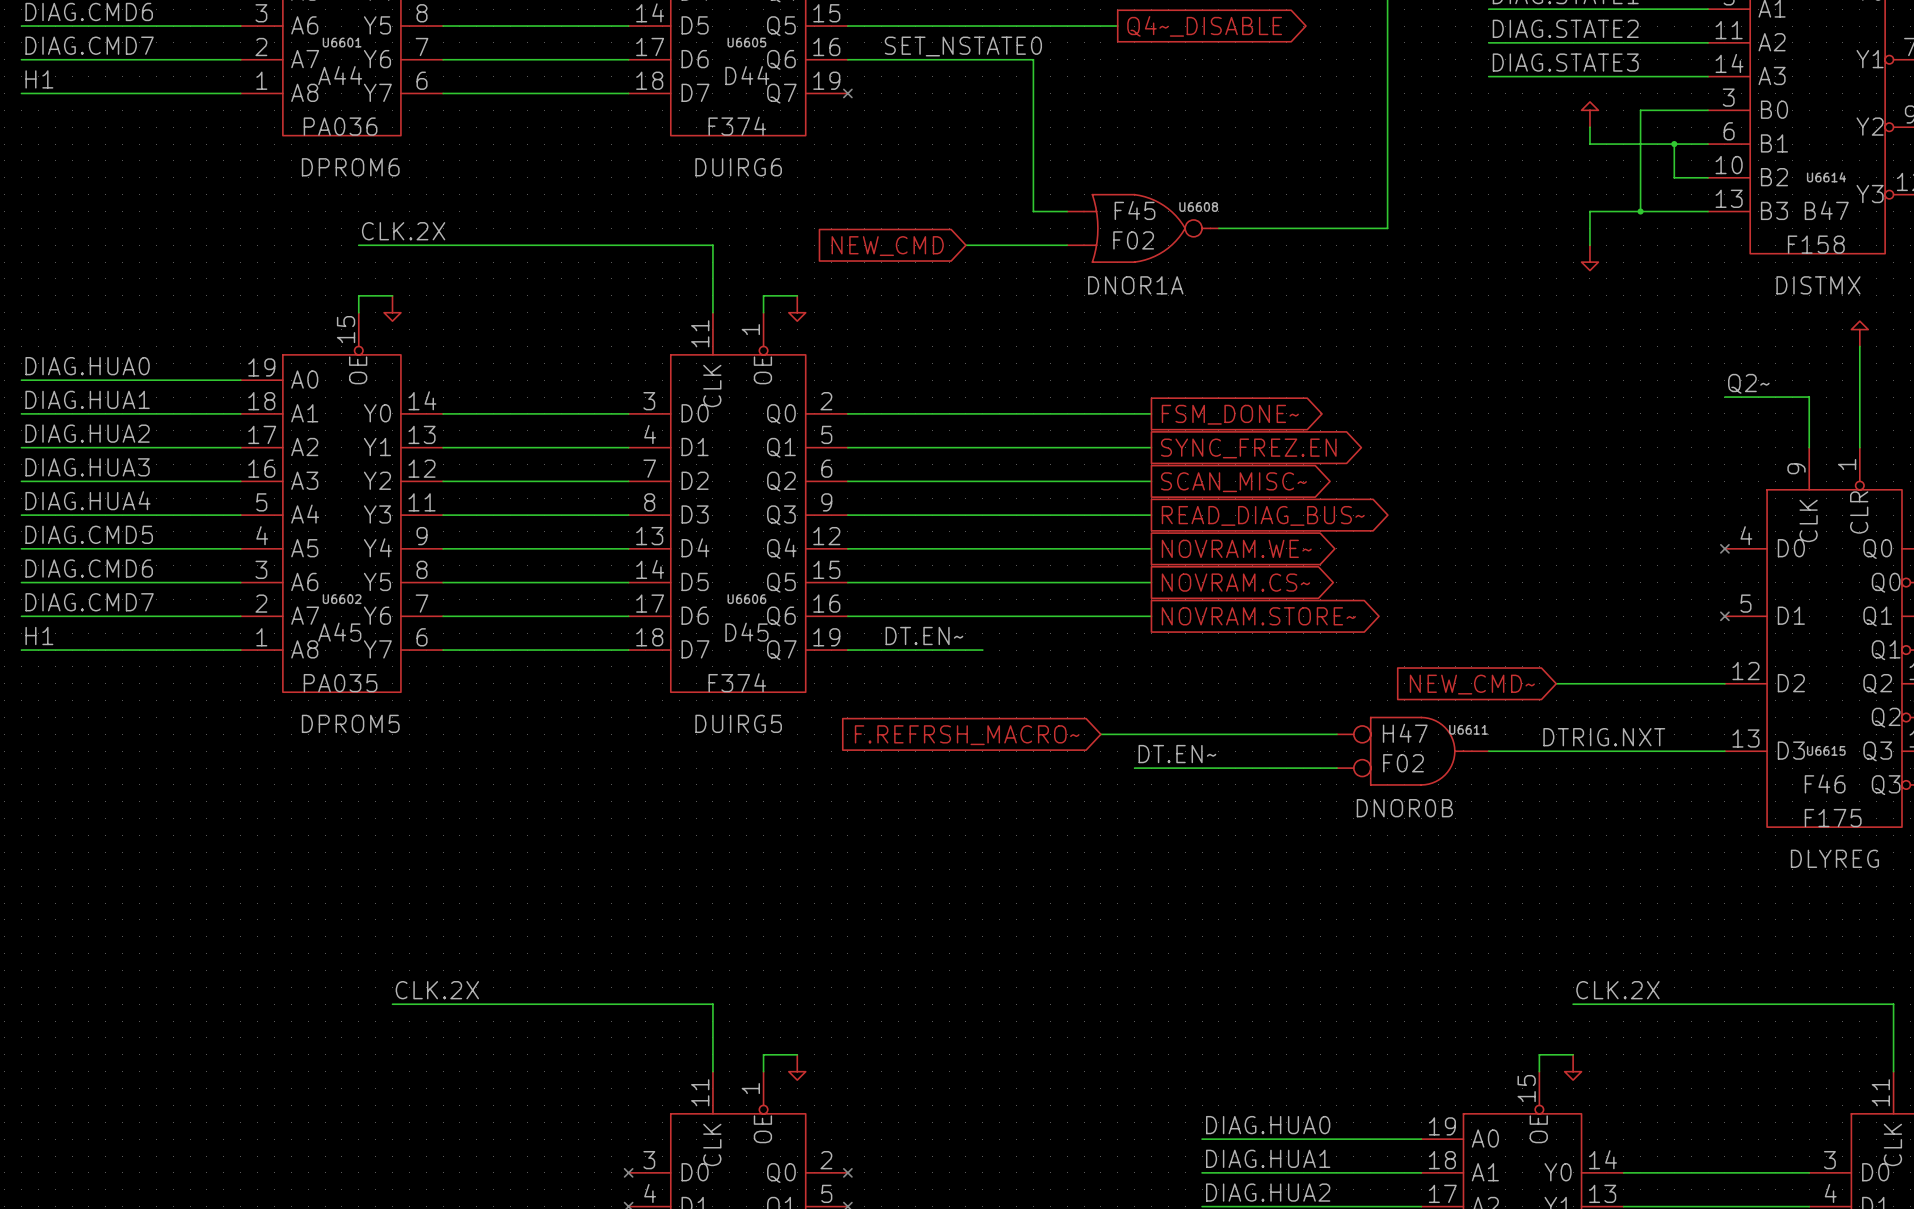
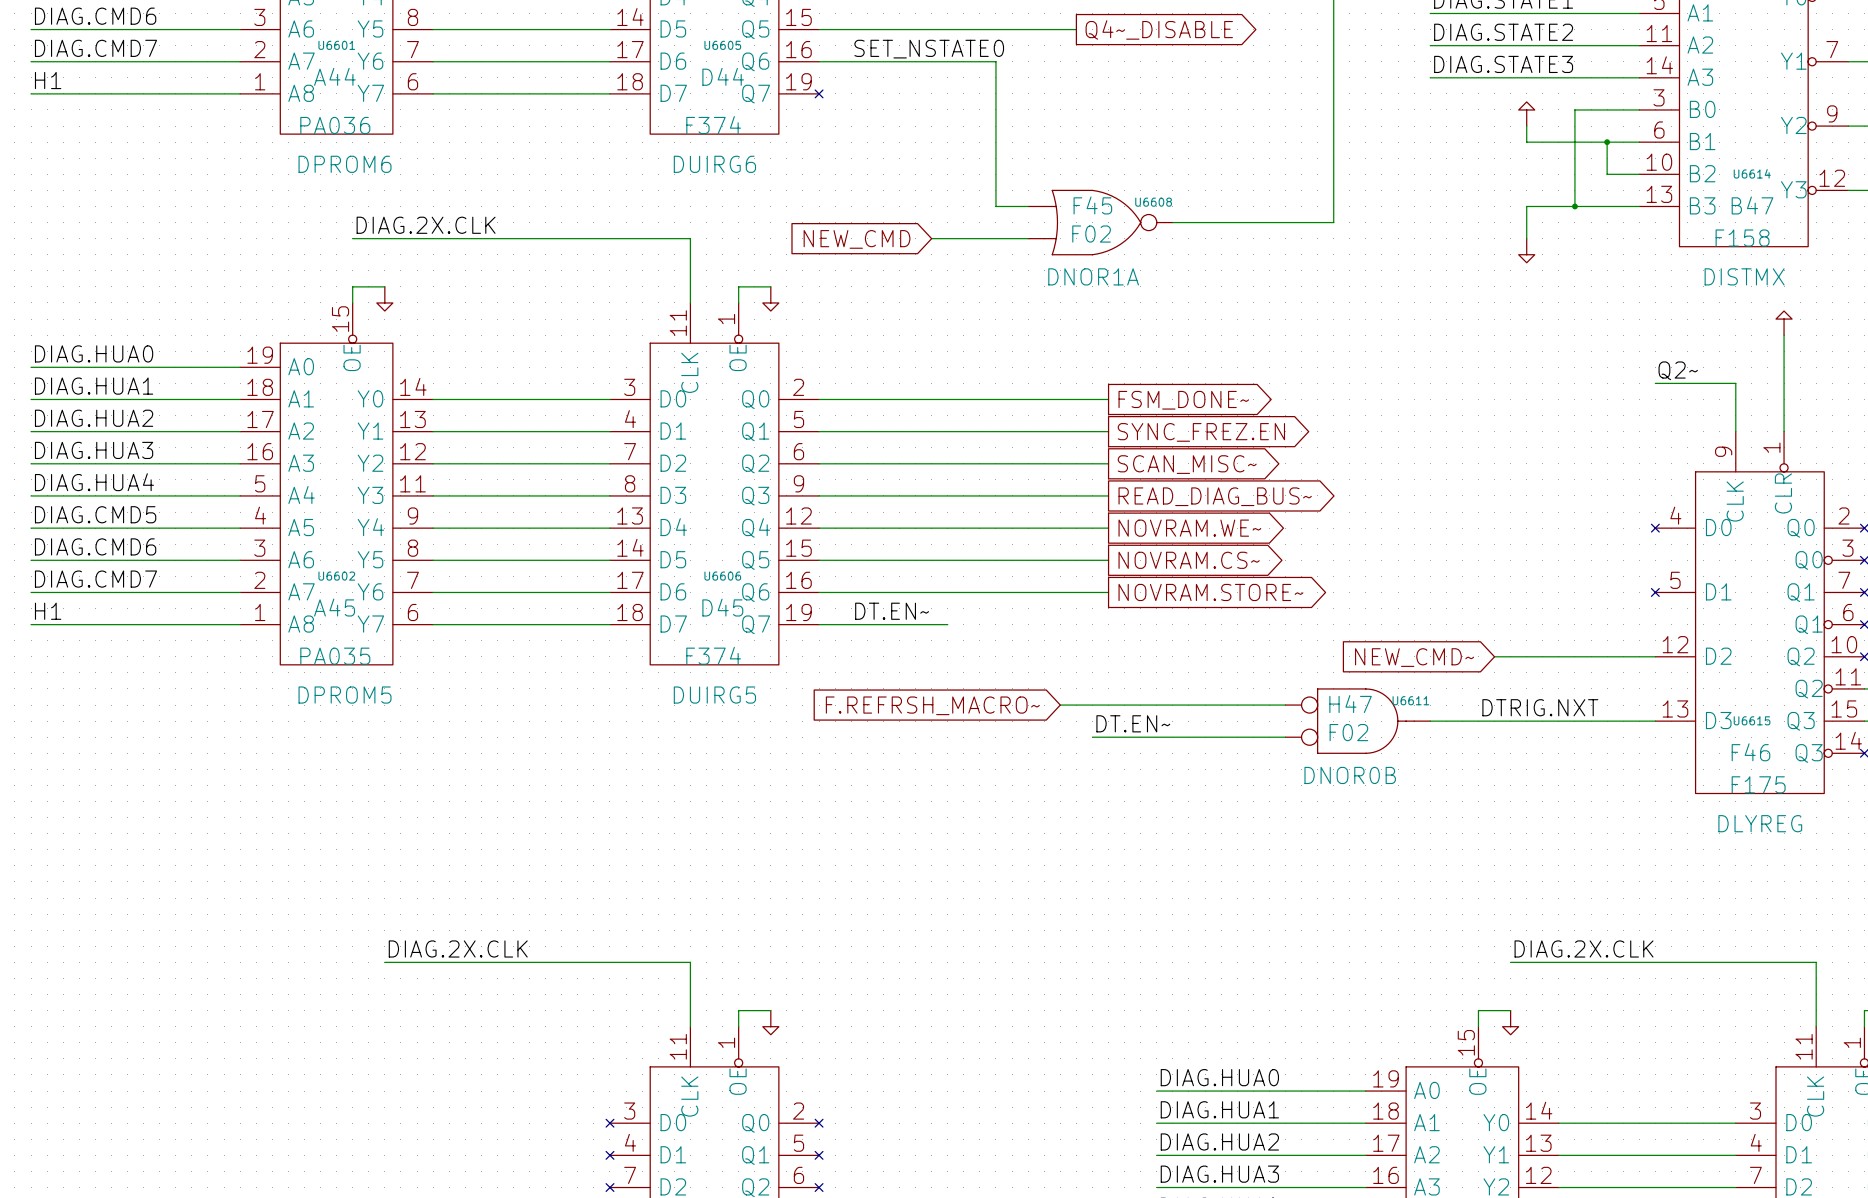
label: CLK.2X (403, 231) -> DIAG.2X.CLK (426, 225)
label: CLK.2X (437, 990) -> DIAG.2X.CLK (458, 948)
label: CLK.2X (1617, 990) -> DIAG.2X.CLK (1584, 948)

